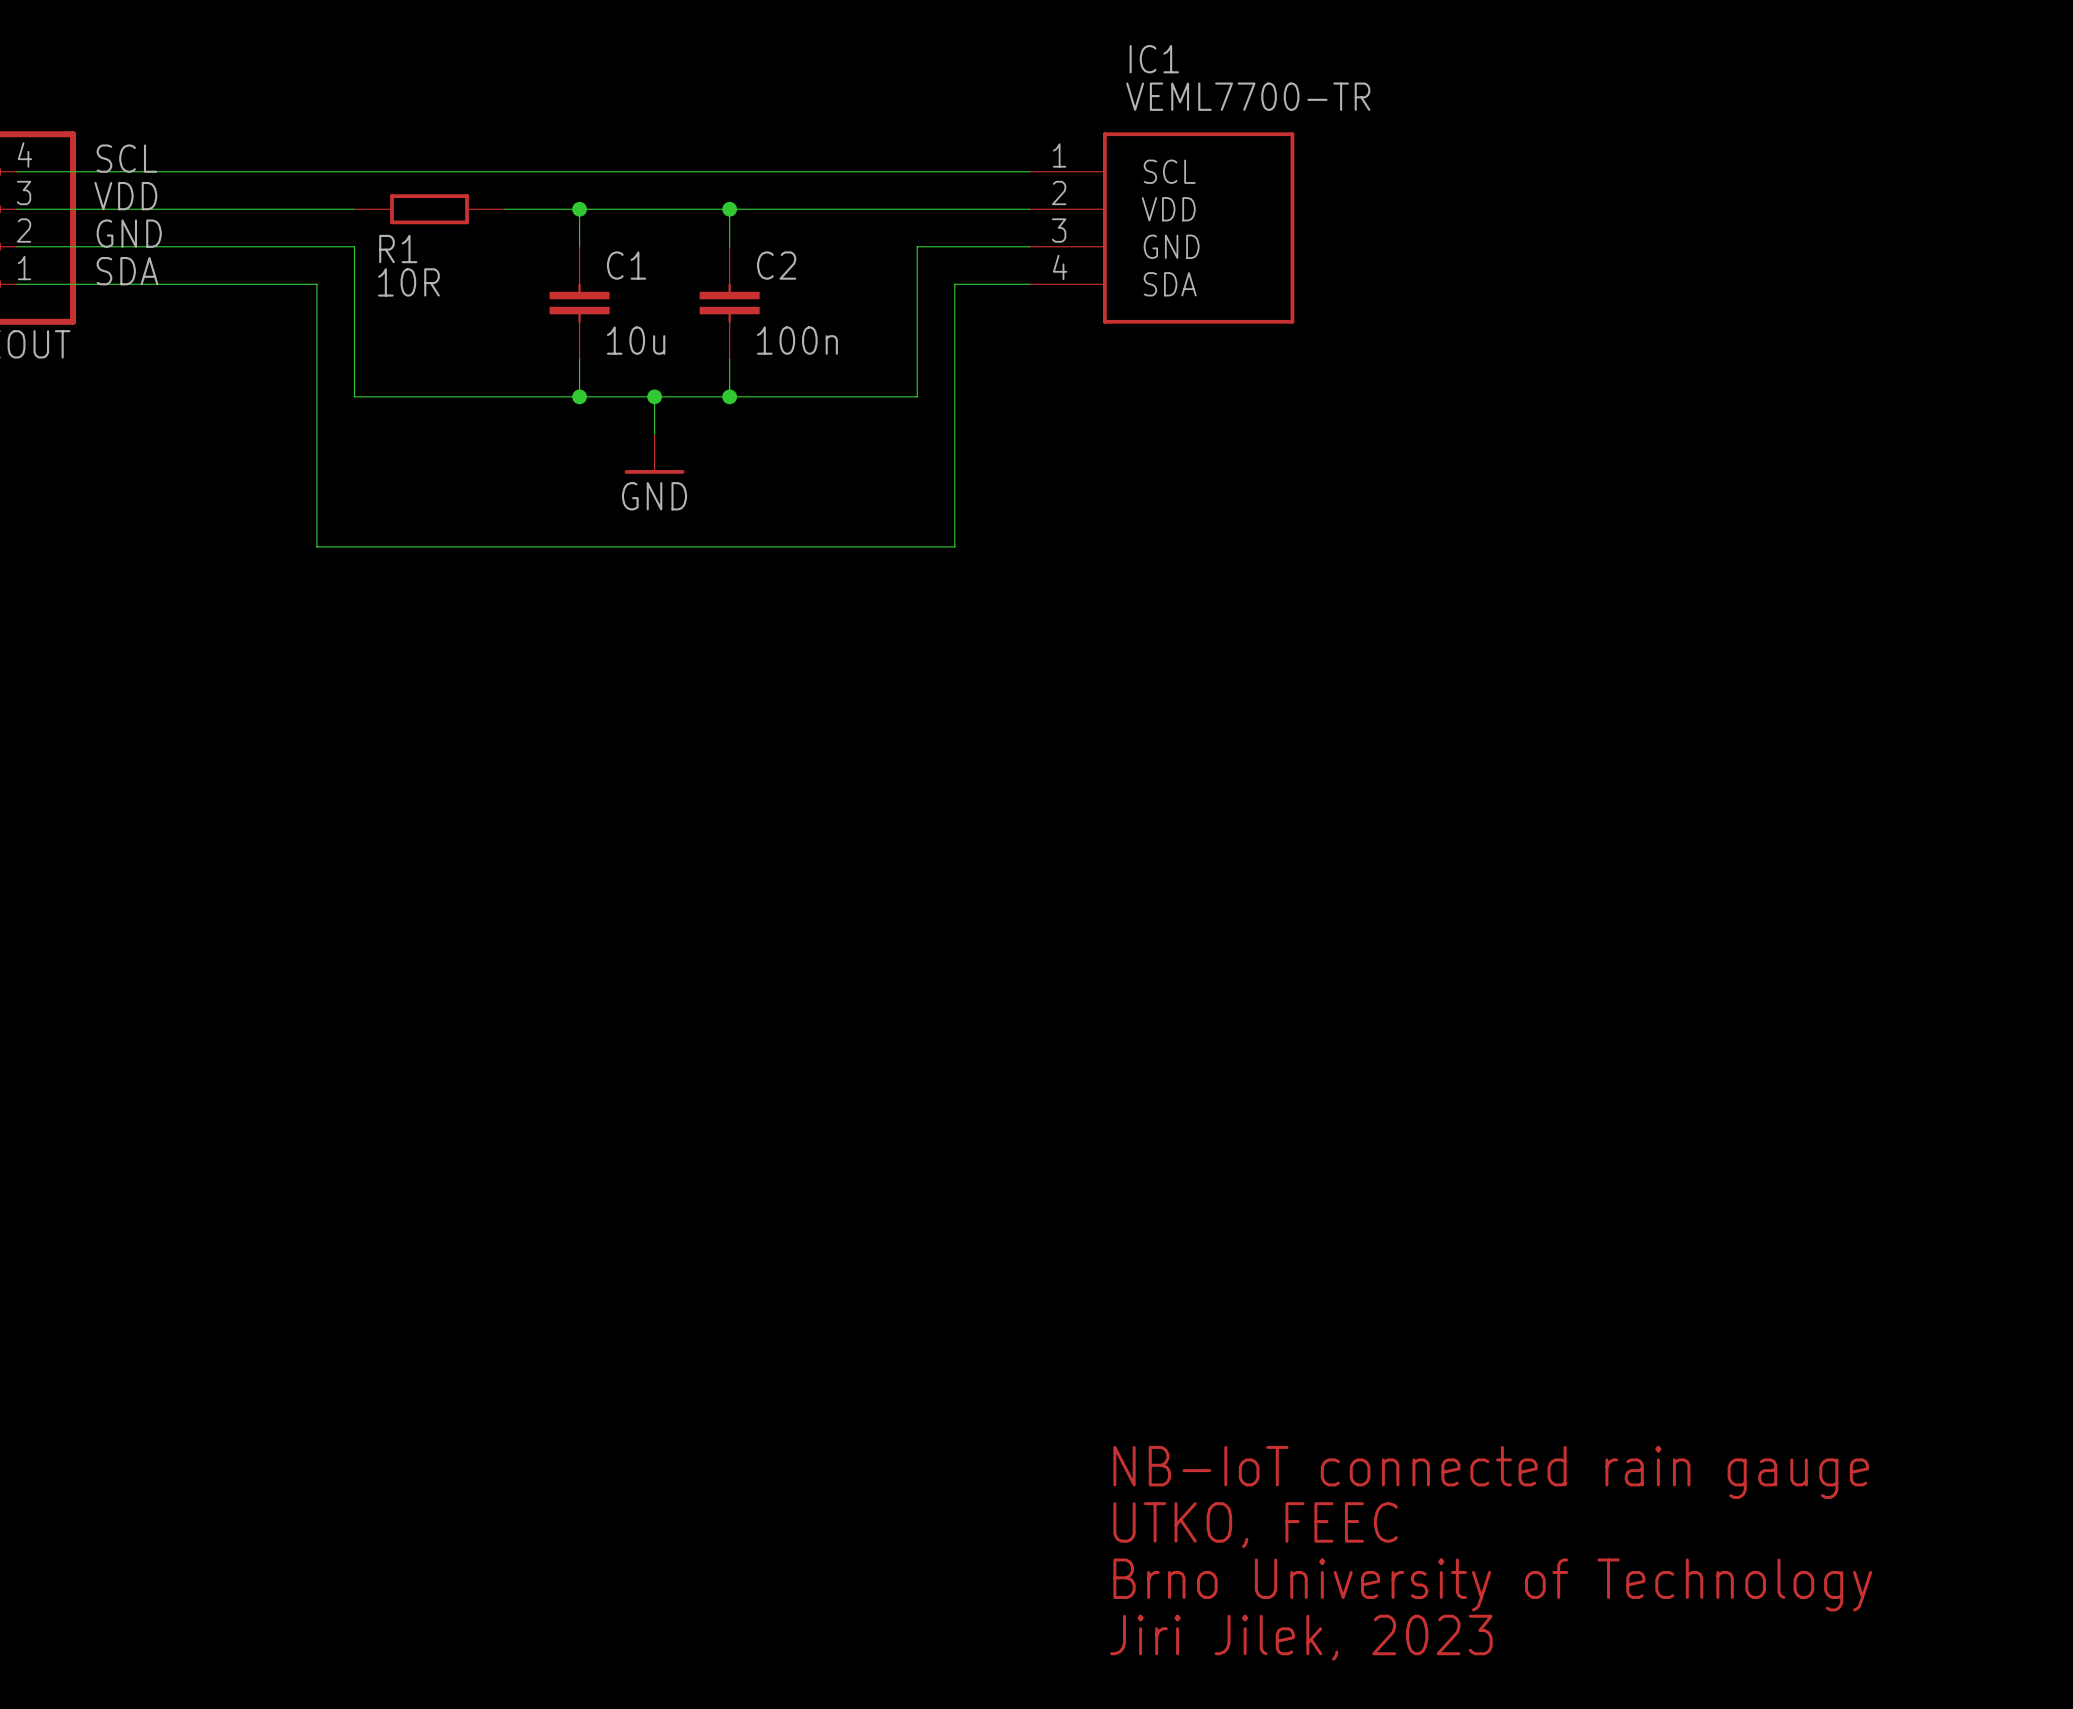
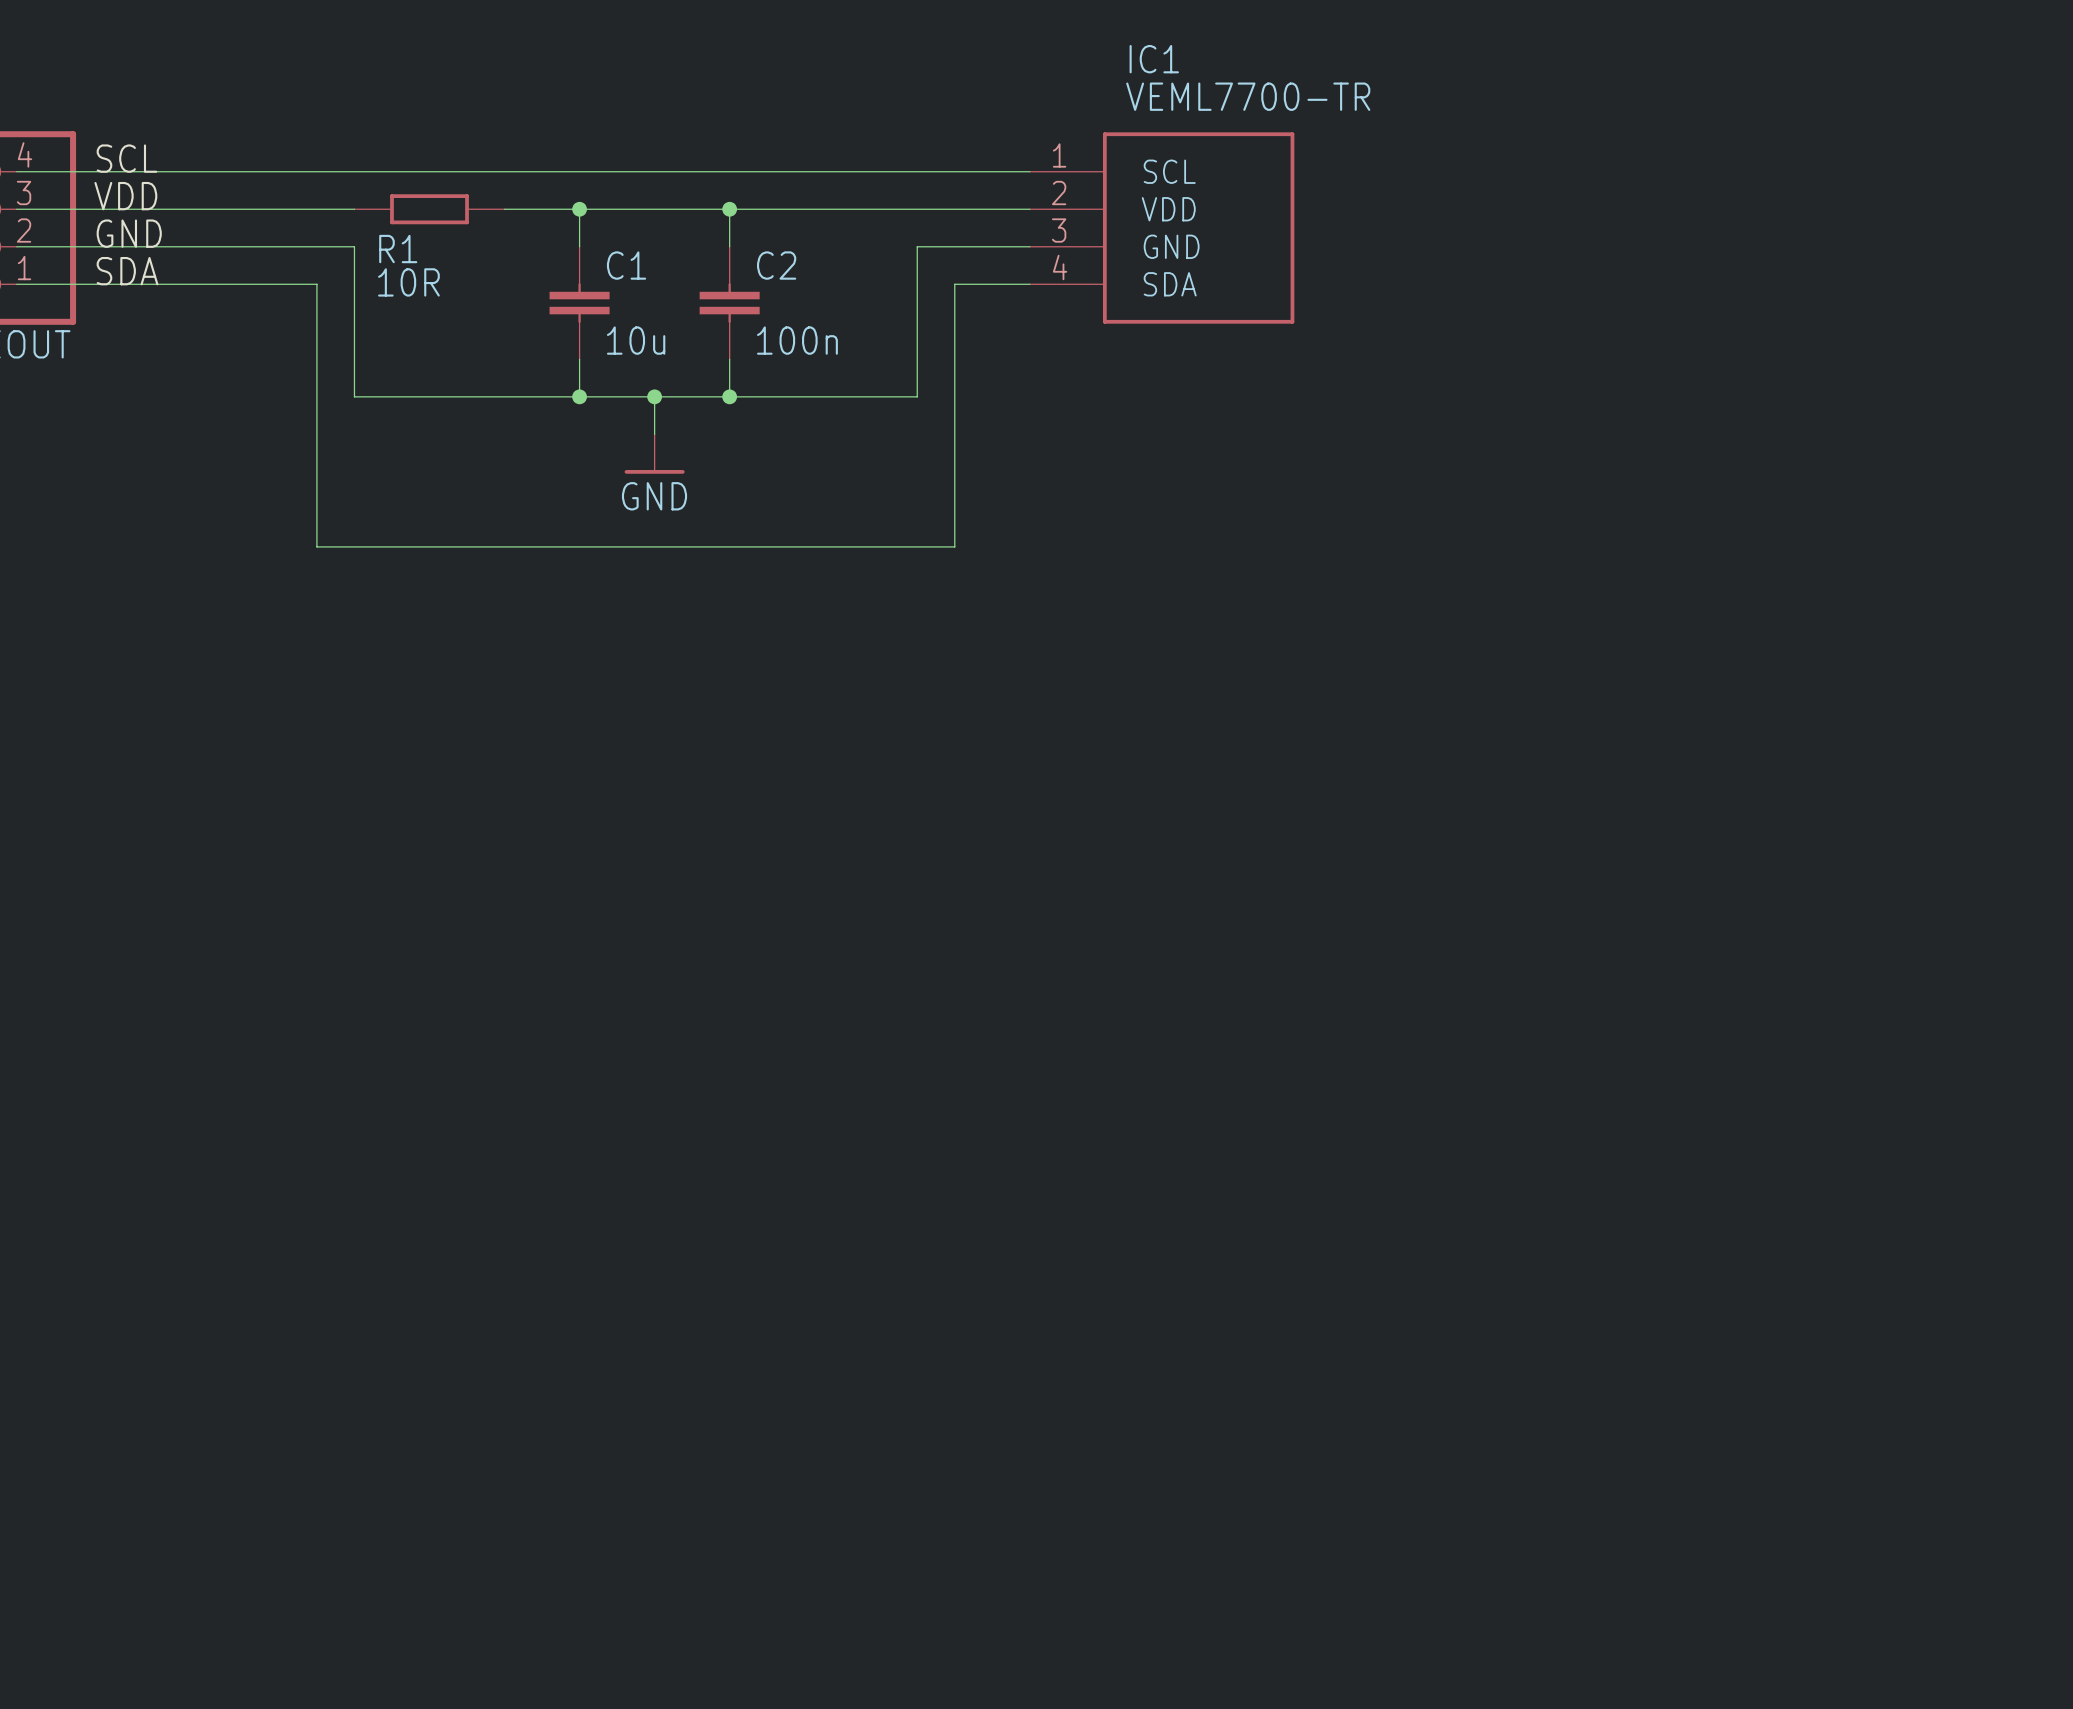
text: NB-IoT connected rain gauge (1491, 1472) -> none
text: UTKO, FEEC (1255, 1525) -> none
text: Brno University of Technology (1492, 1584) -> none
text: Jiri Jilek, 2023 (1301, 1637) -> none

